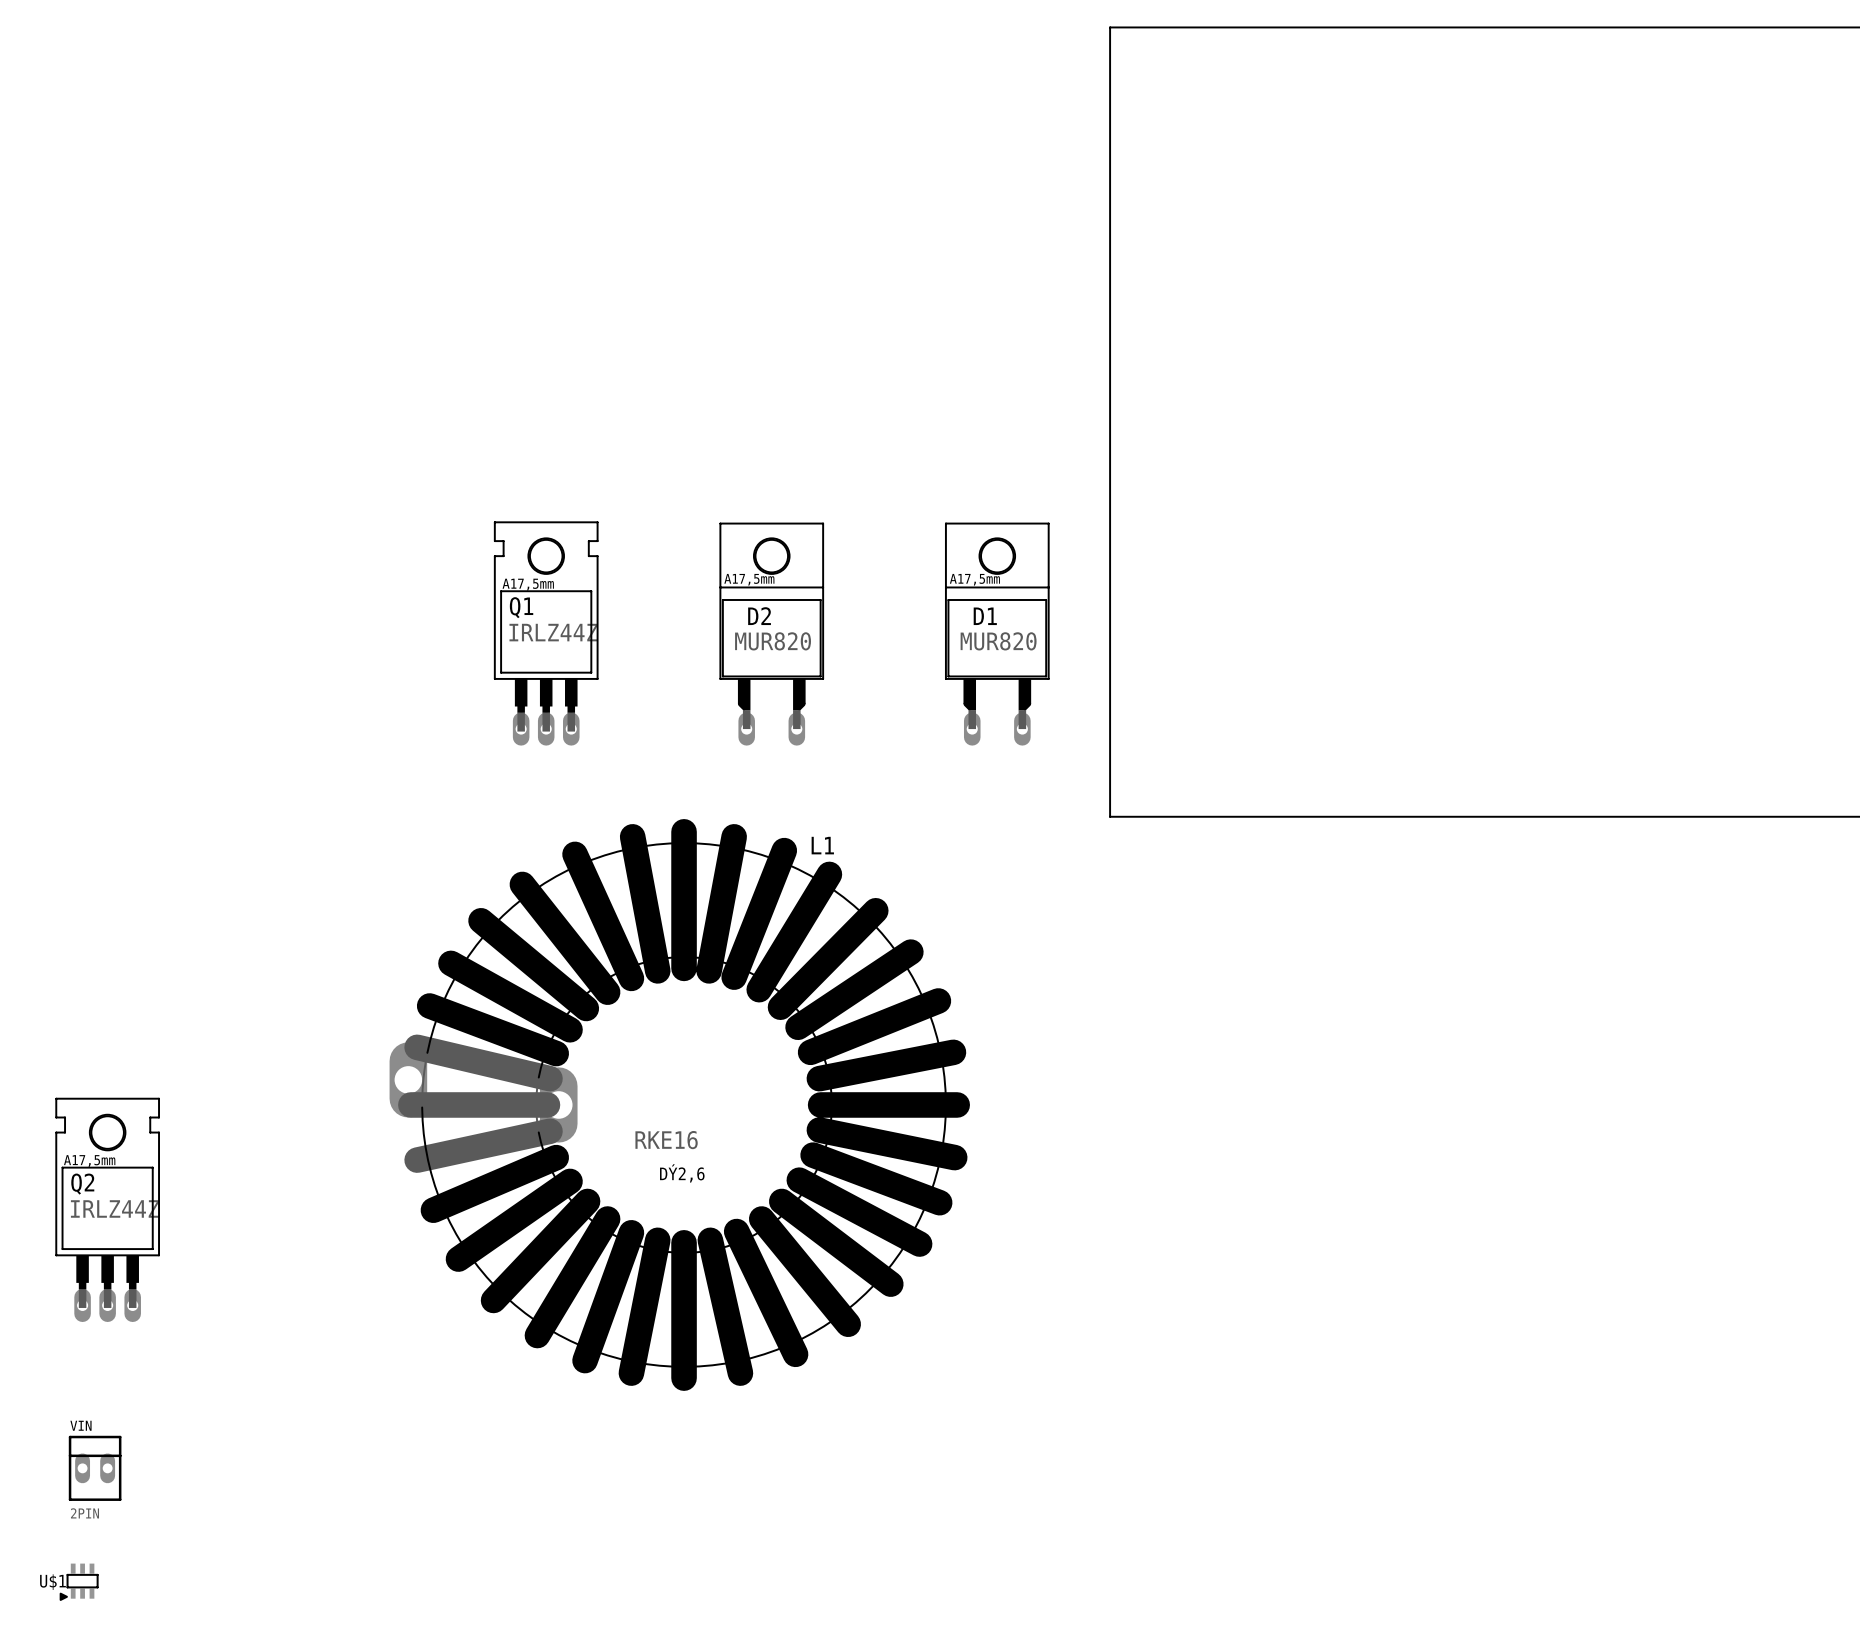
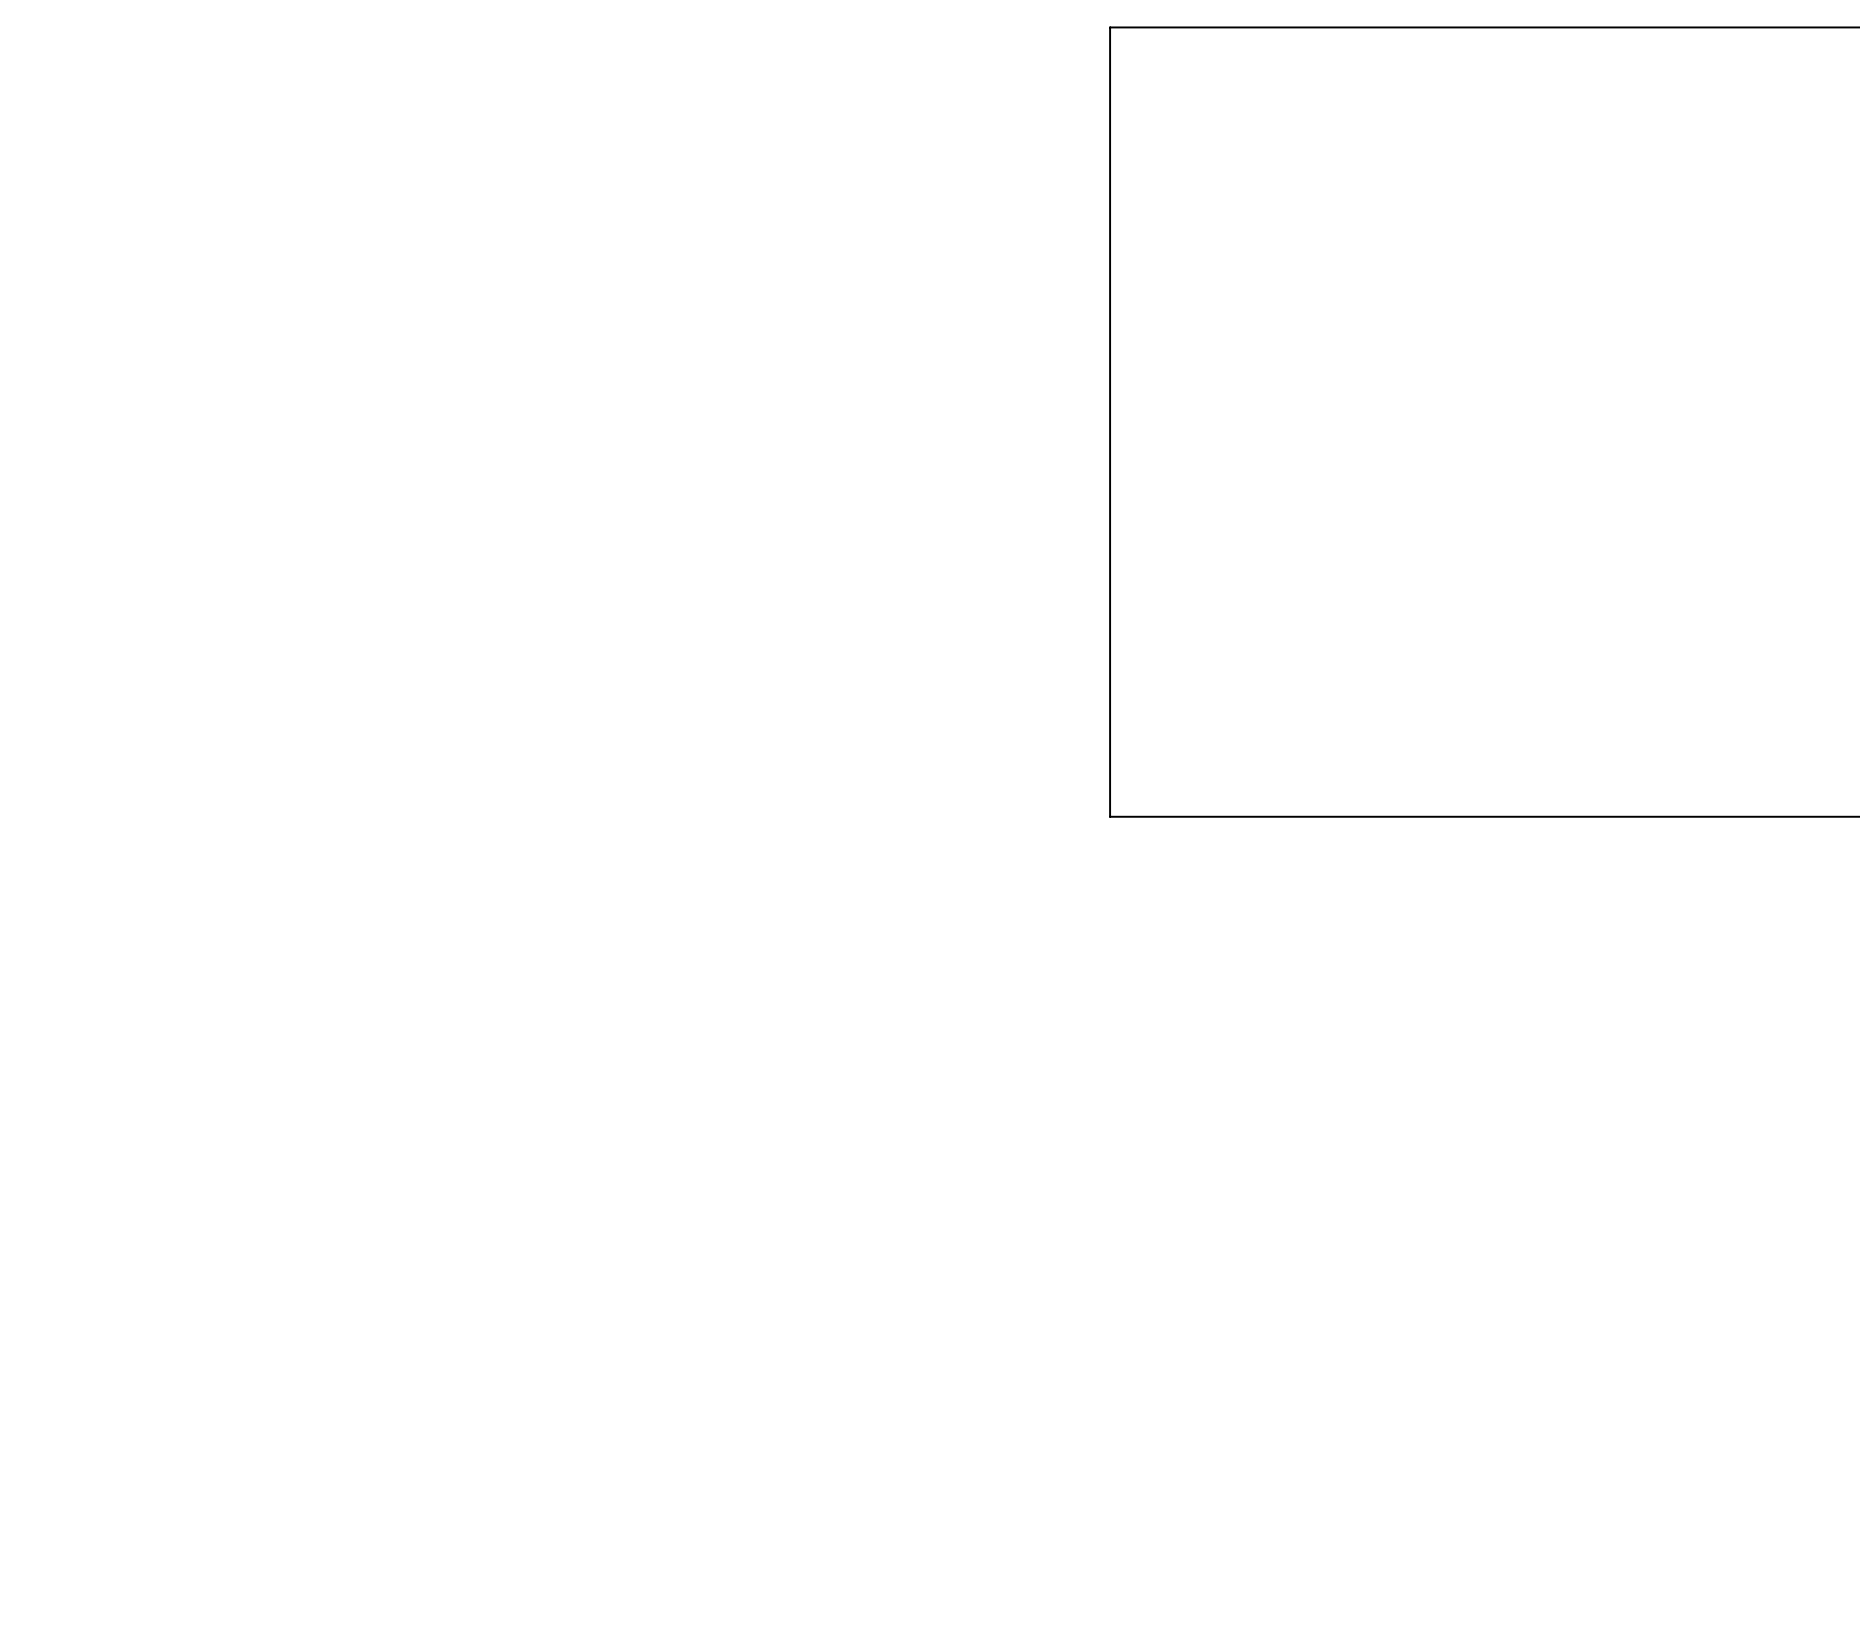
Q1: IRLZ44Z (546, 633) -> none
D2: MUR820 (771, 634) -> none
D1: MUR820 (997, 634) -> none
L1: RKE16 (679, 1104) -> none
Q2: IRLZ44Z (107, 1209) -> none
VIN: 2PIN (95, 1468) -> none
U$1: (79, 1582) -> none

